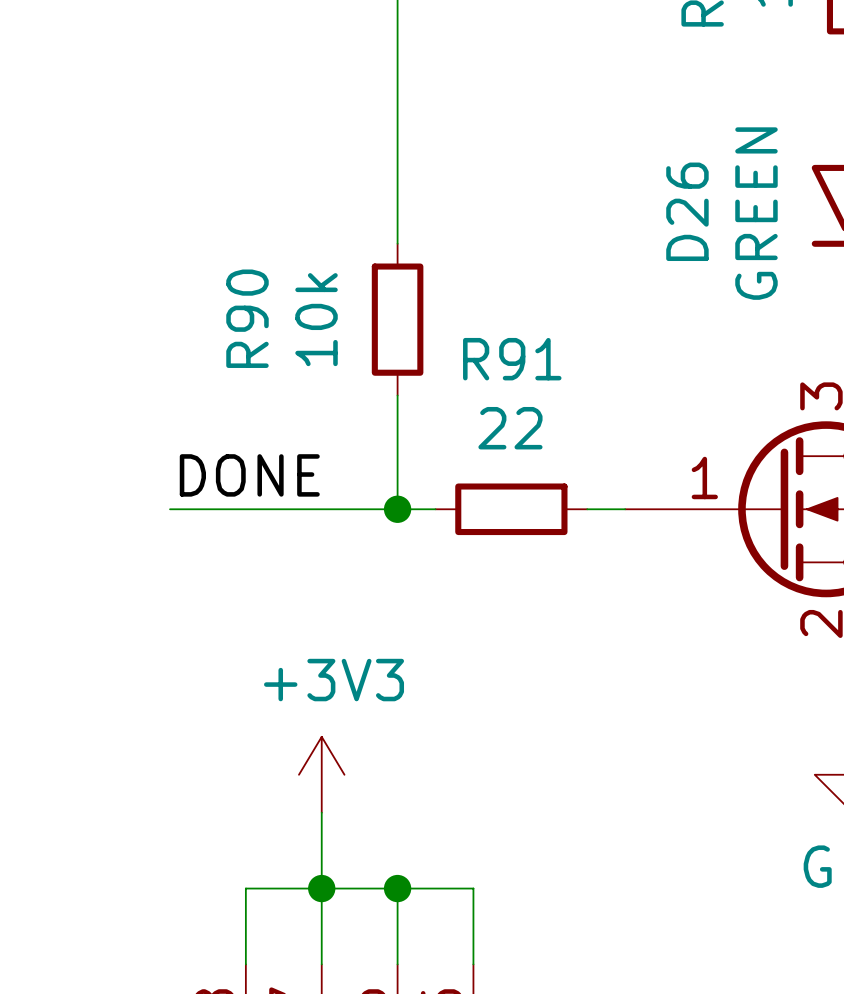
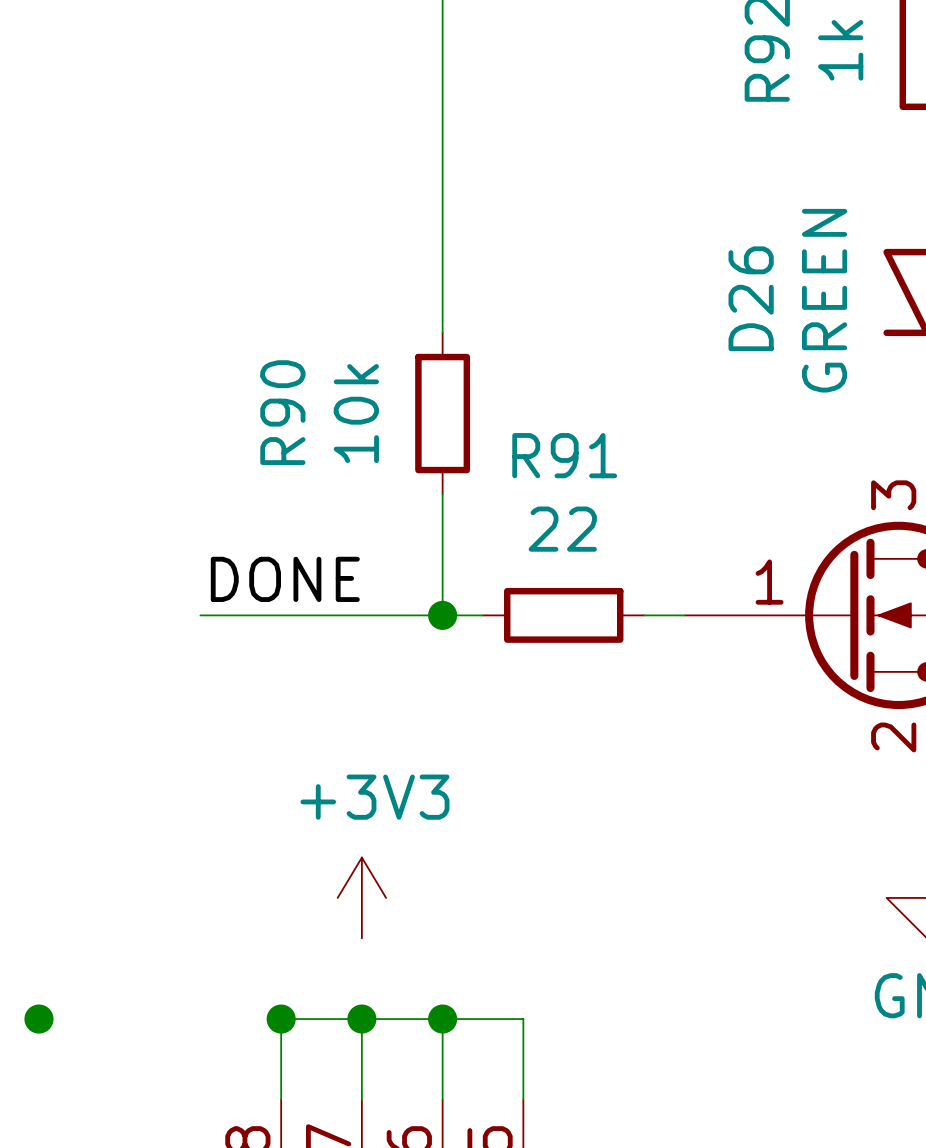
wire: (321, 812) (321, 888) -> none
junction: none -> (38, 1019)
junction: none -> (281, 1019)

